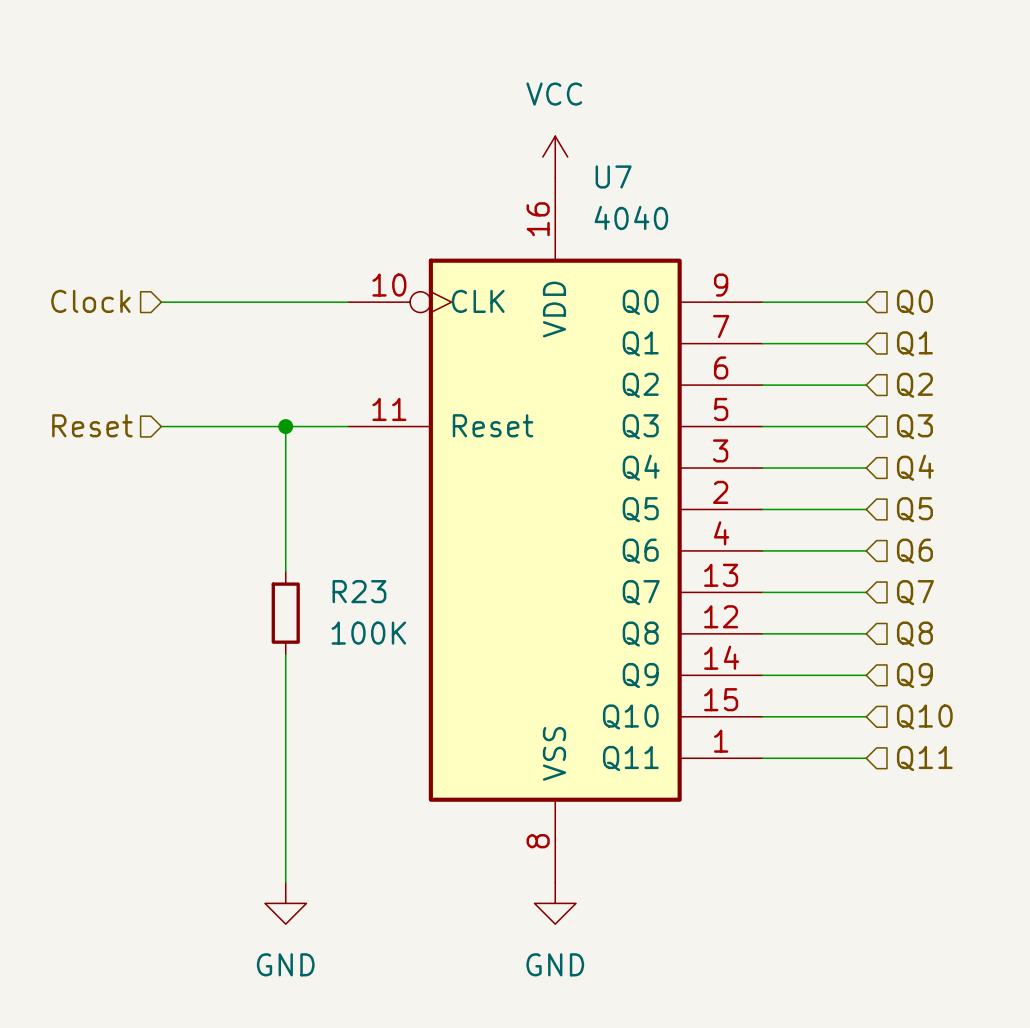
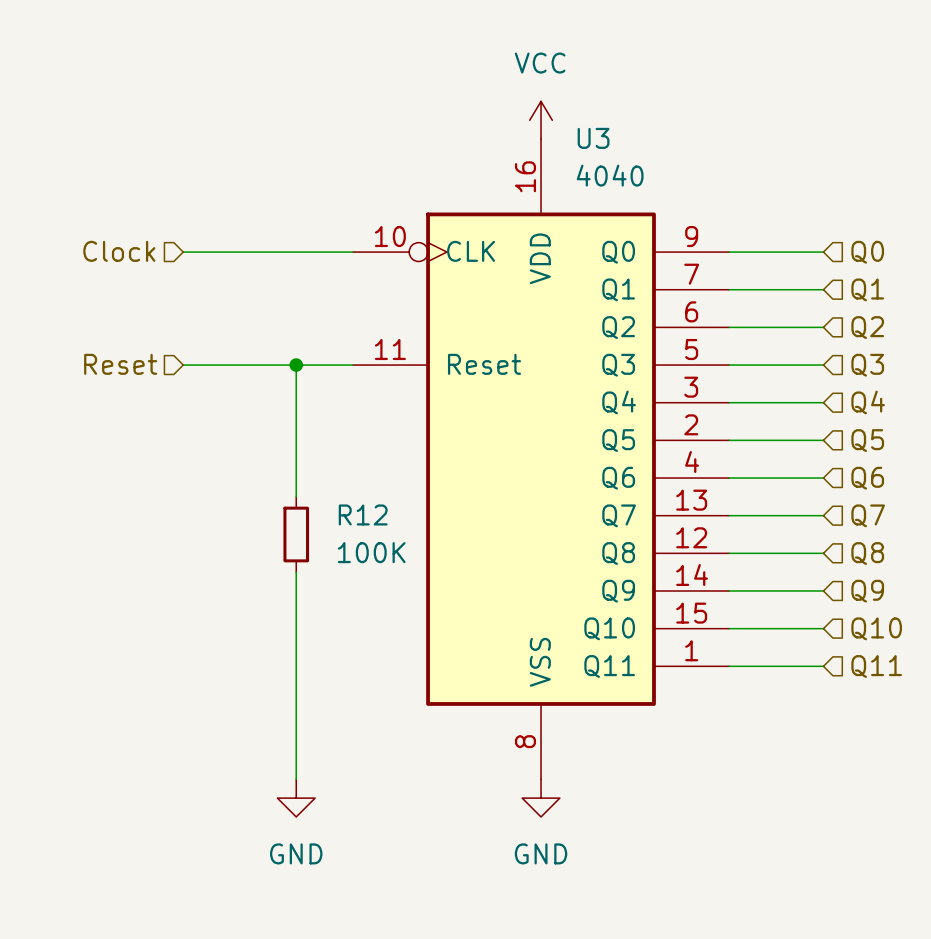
U7 name: U7 (613, 176) -> U3 (593, 138)
R23 name: R23 (359, 591) -> R12 (363, 514)

